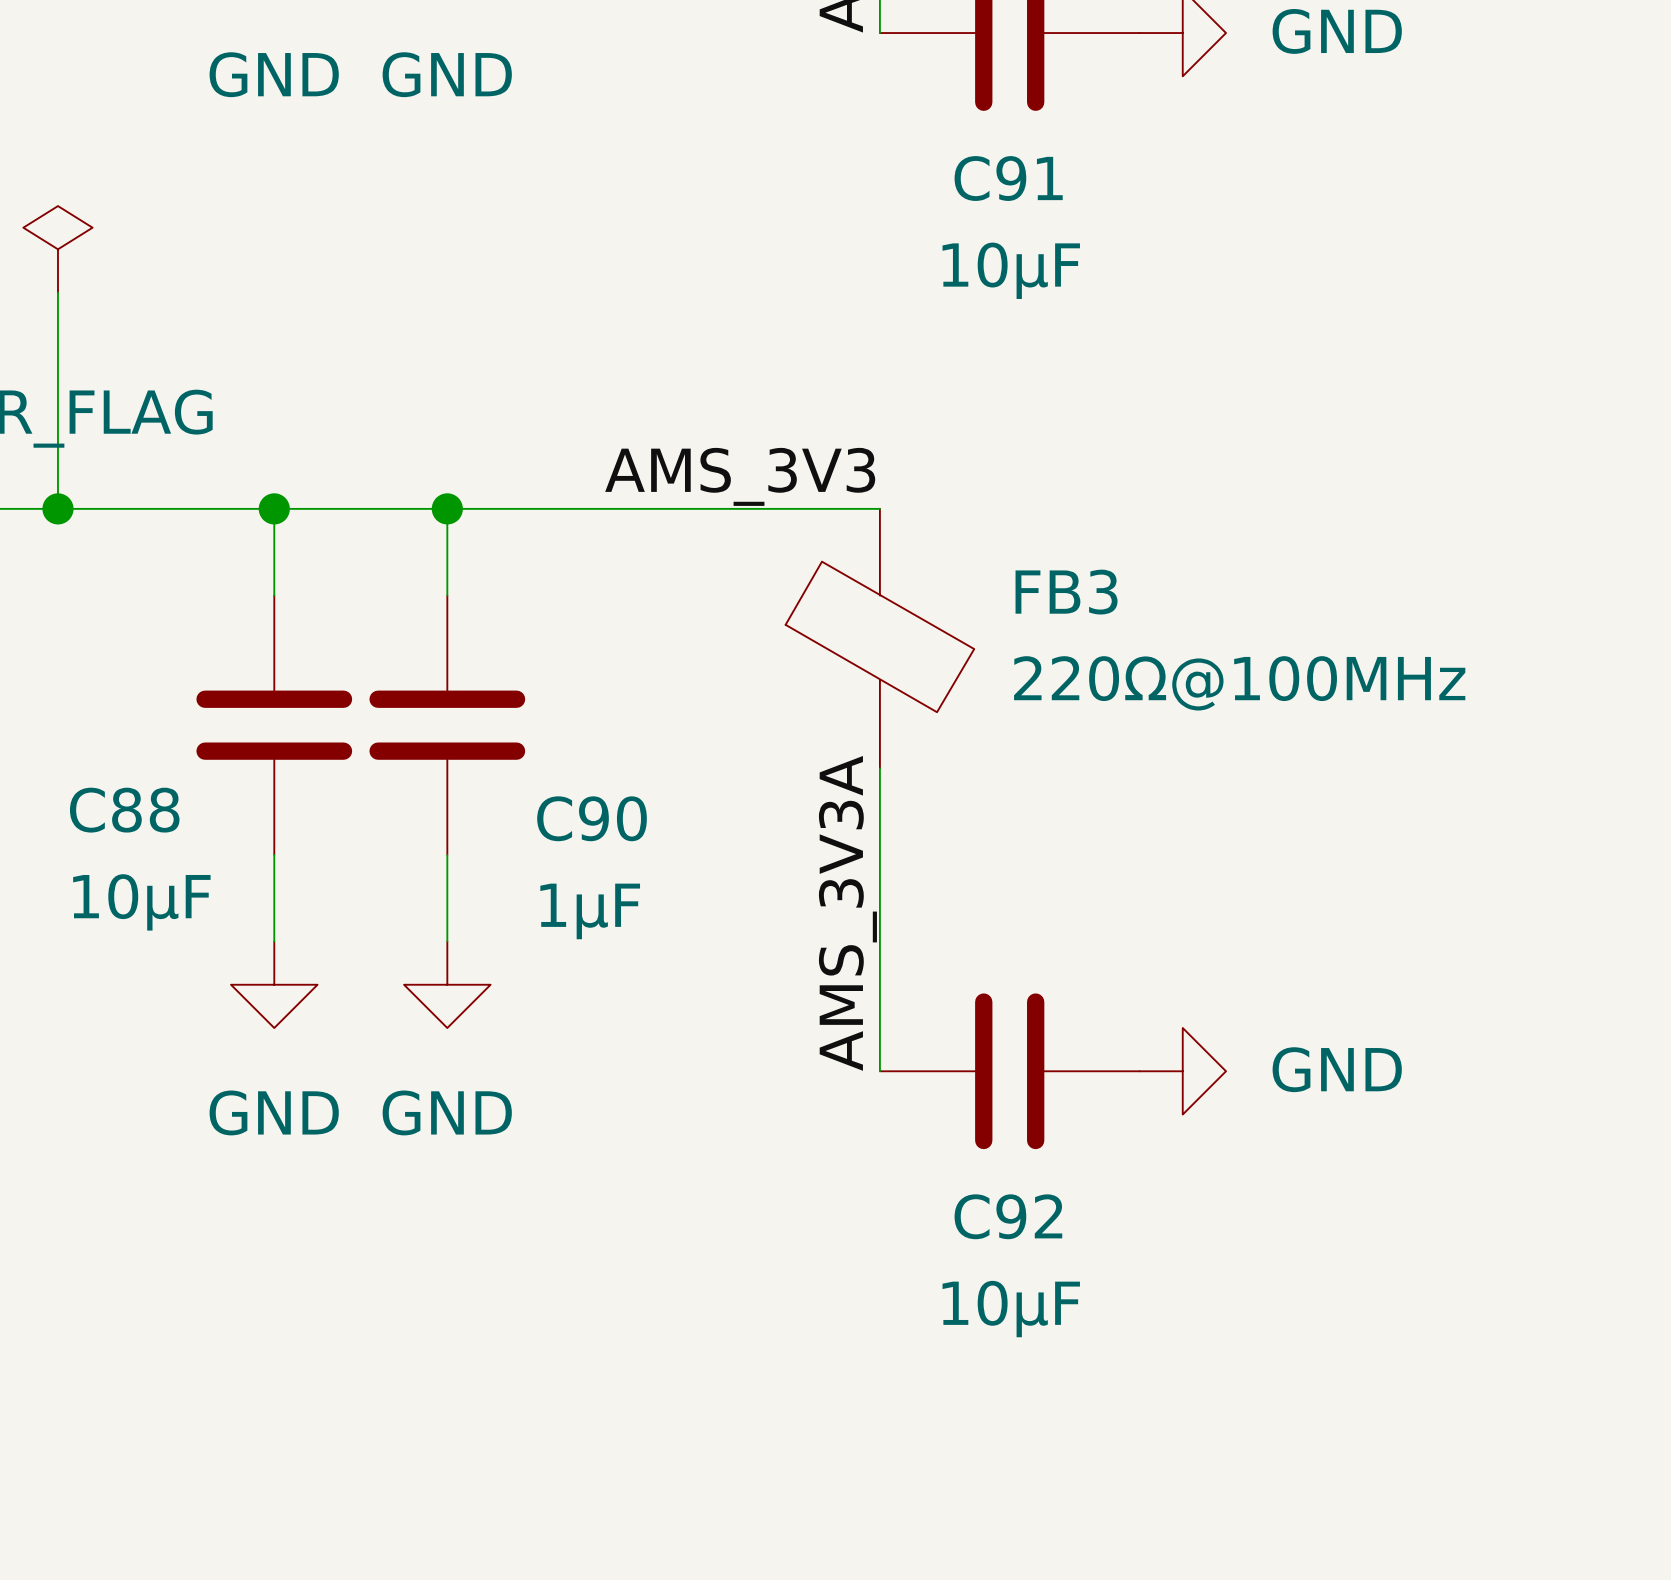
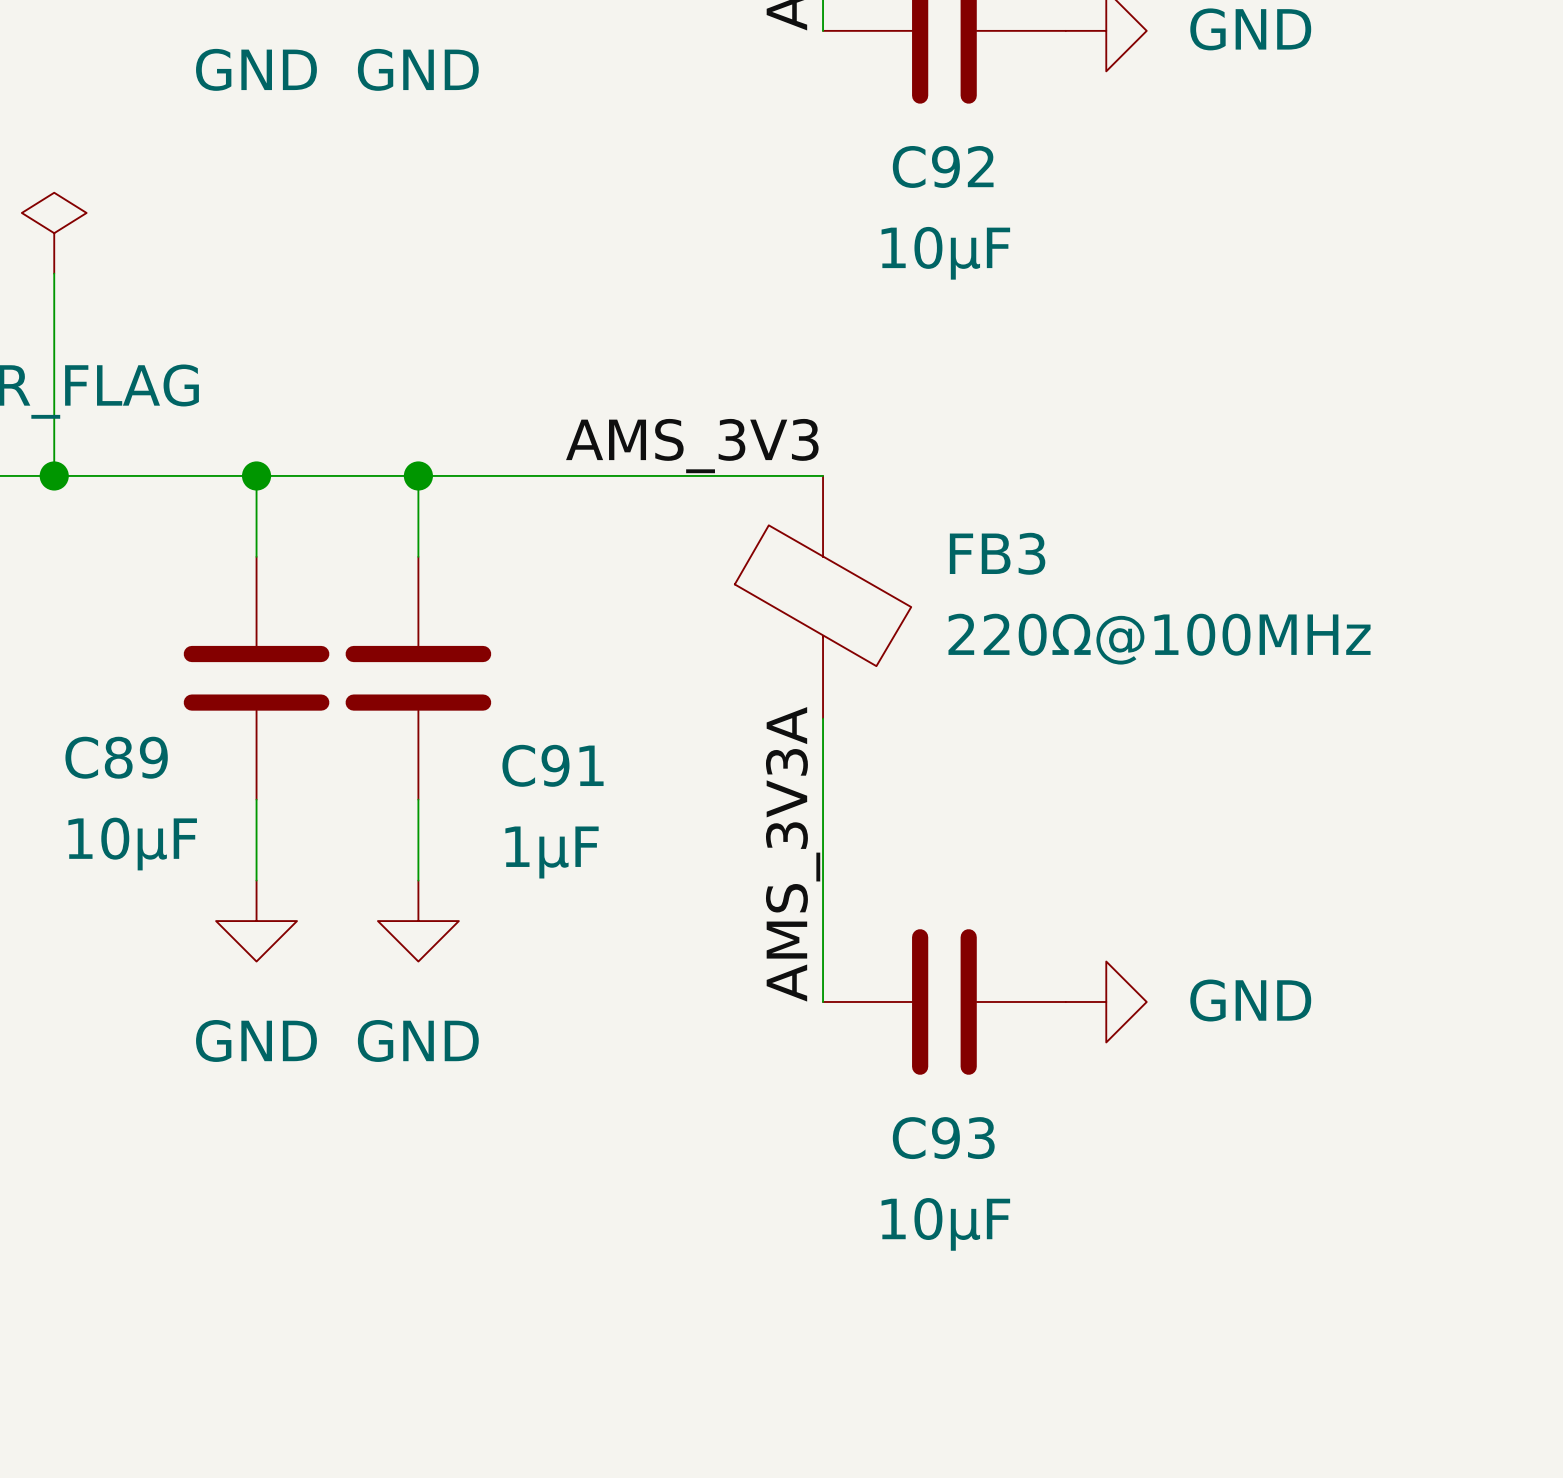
C91 name: C91 (1008, 178) -> C92 (943, 166)
C88 name: C88 (124, 810) -> C89 (116, 757)
C90 name: C90 (592, 818) -> C91 (553, 765)
C92 name: C92 (1008, 1216) -> C93 (943, 1138)

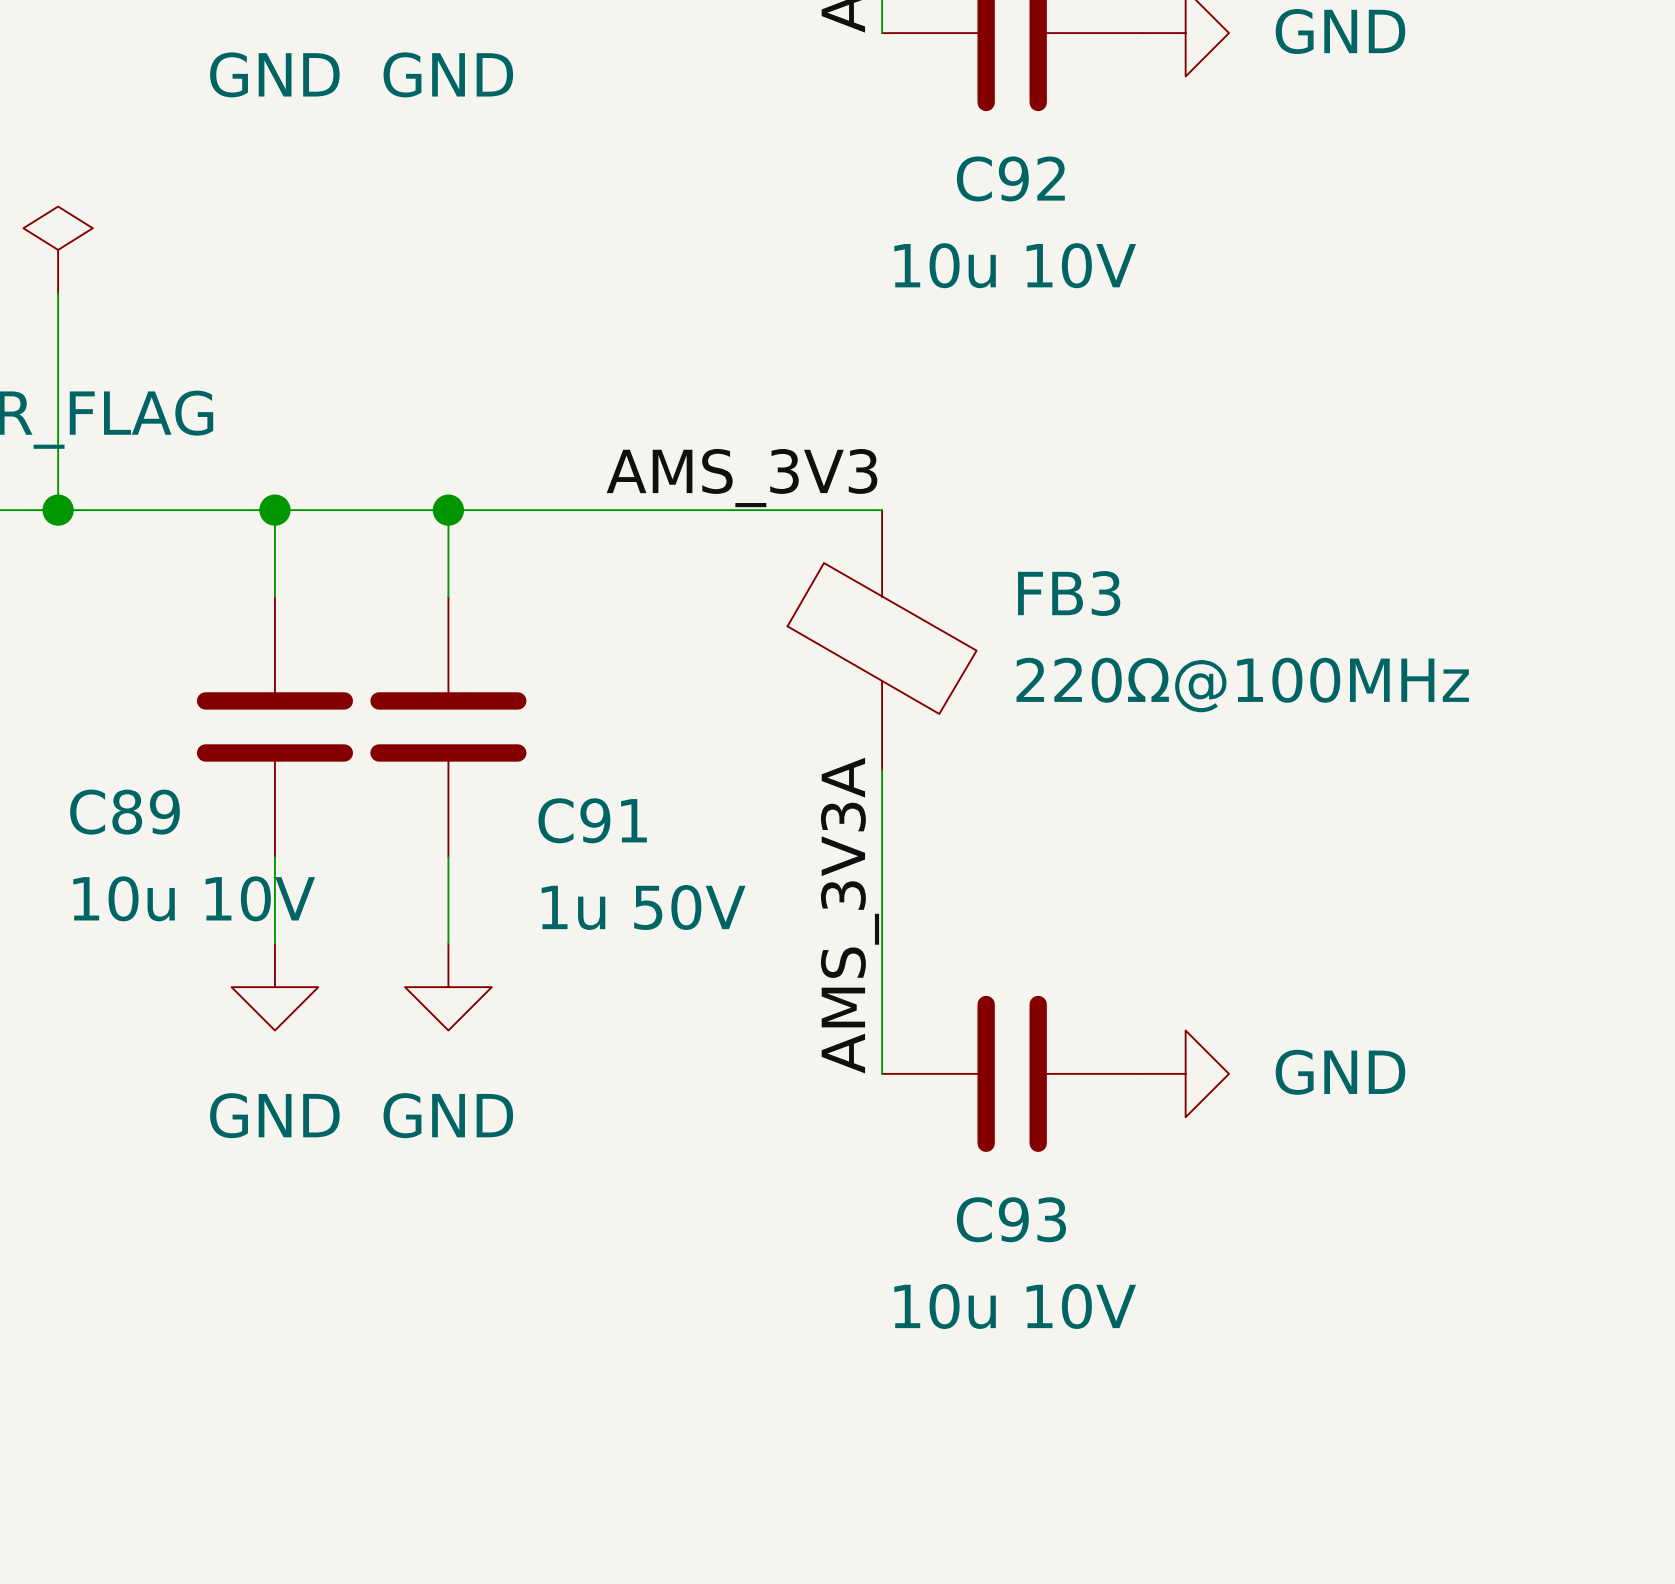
C92 value: 10µF (945, 253) -> 10u 10V (1015, 265)
C89 value: 10µF (132, 844) -> 10u 10V (194, 898)
C91 value: 1µF (552, 852) -> 1u 50V (643, 907)
C93 value: 10µF (945, 1224) -> 10u 10V (1015, 1306)

